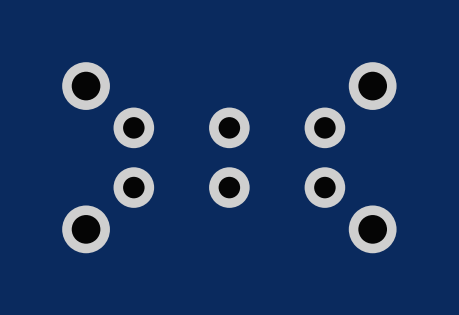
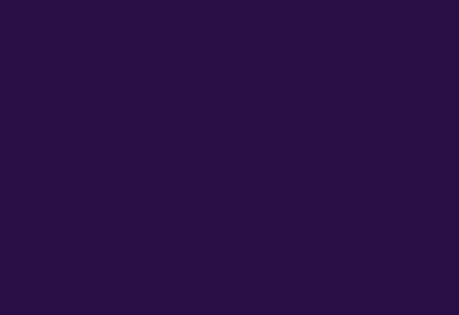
part: (229, 157) -> none

